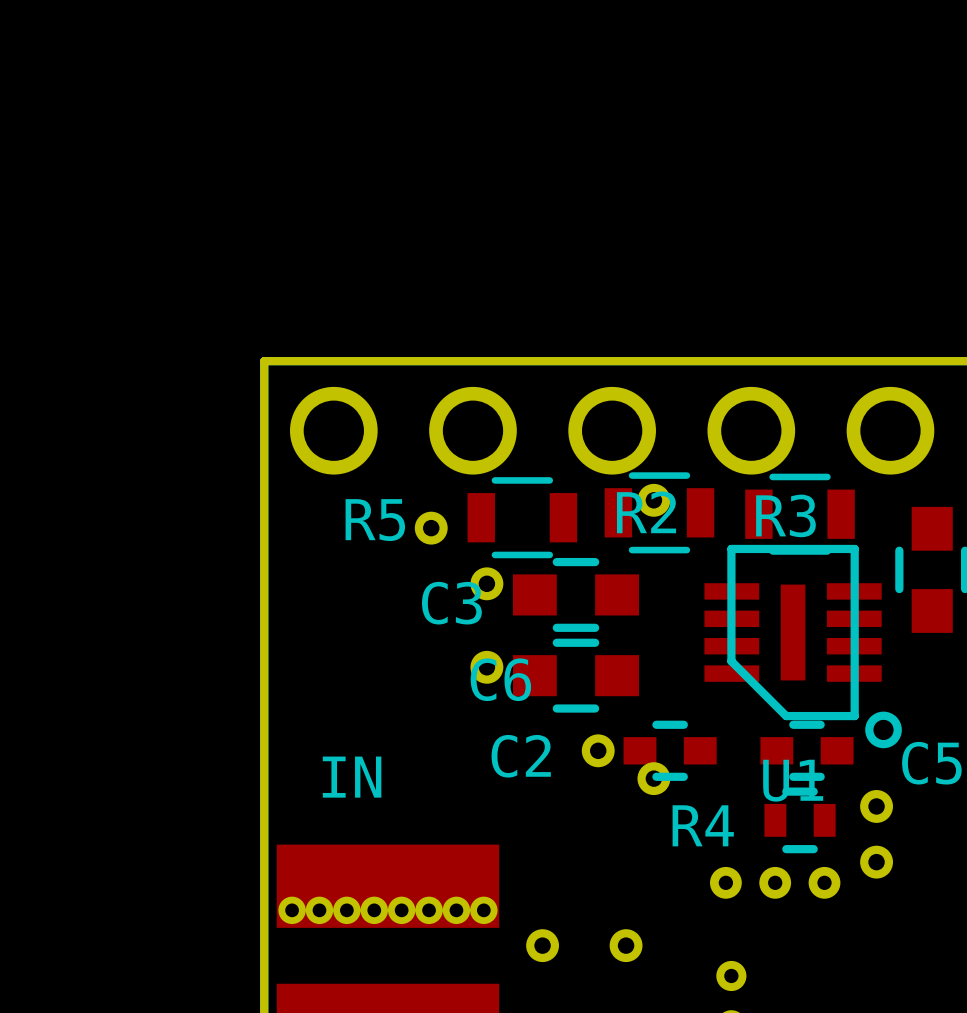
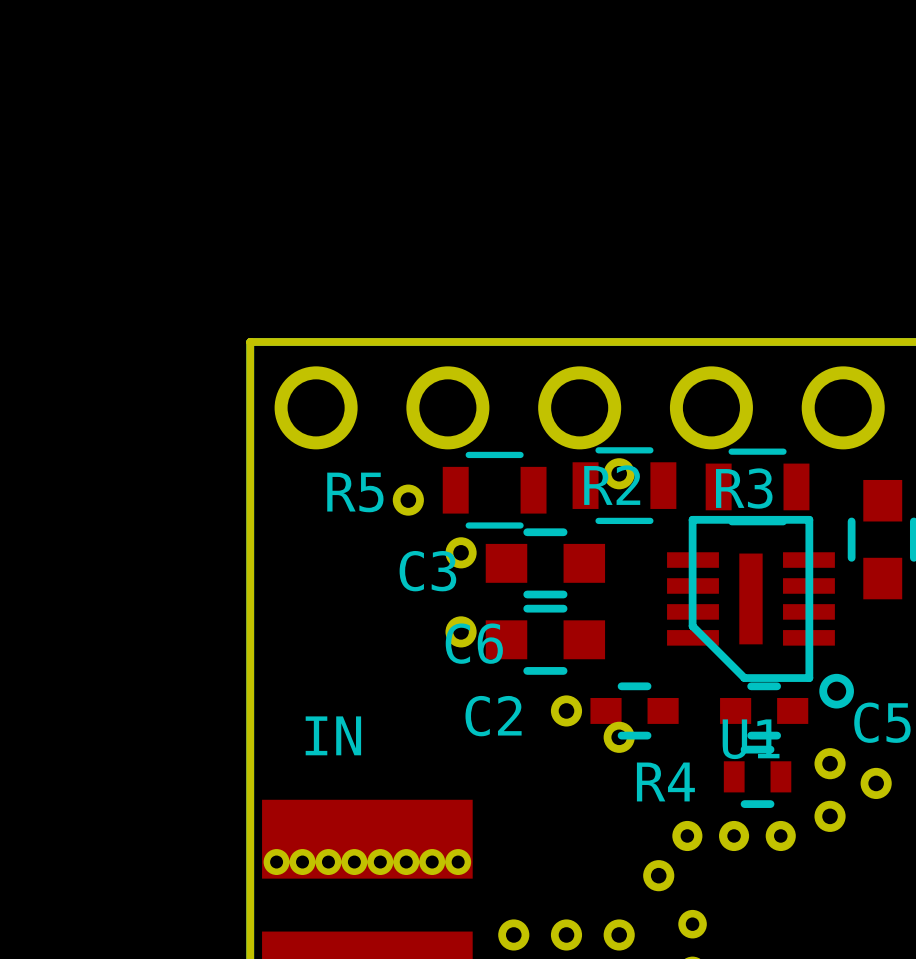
part: none -> (876, 783)
part: none -> (658, 875)
part: (542, 945) -> none
part: (626, 945) -> none
part: none -> (513, 934)
part: none -> (566, 934)
part: none -> (619, 934)

